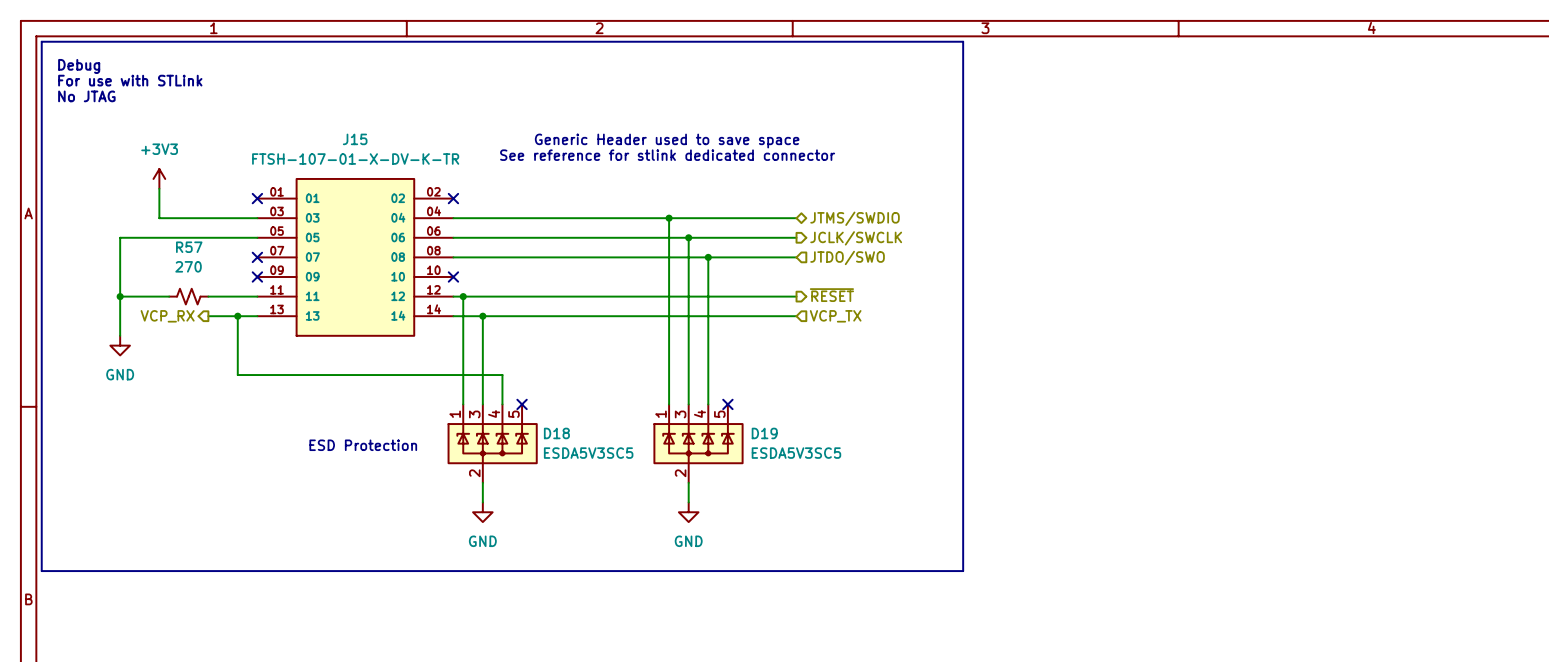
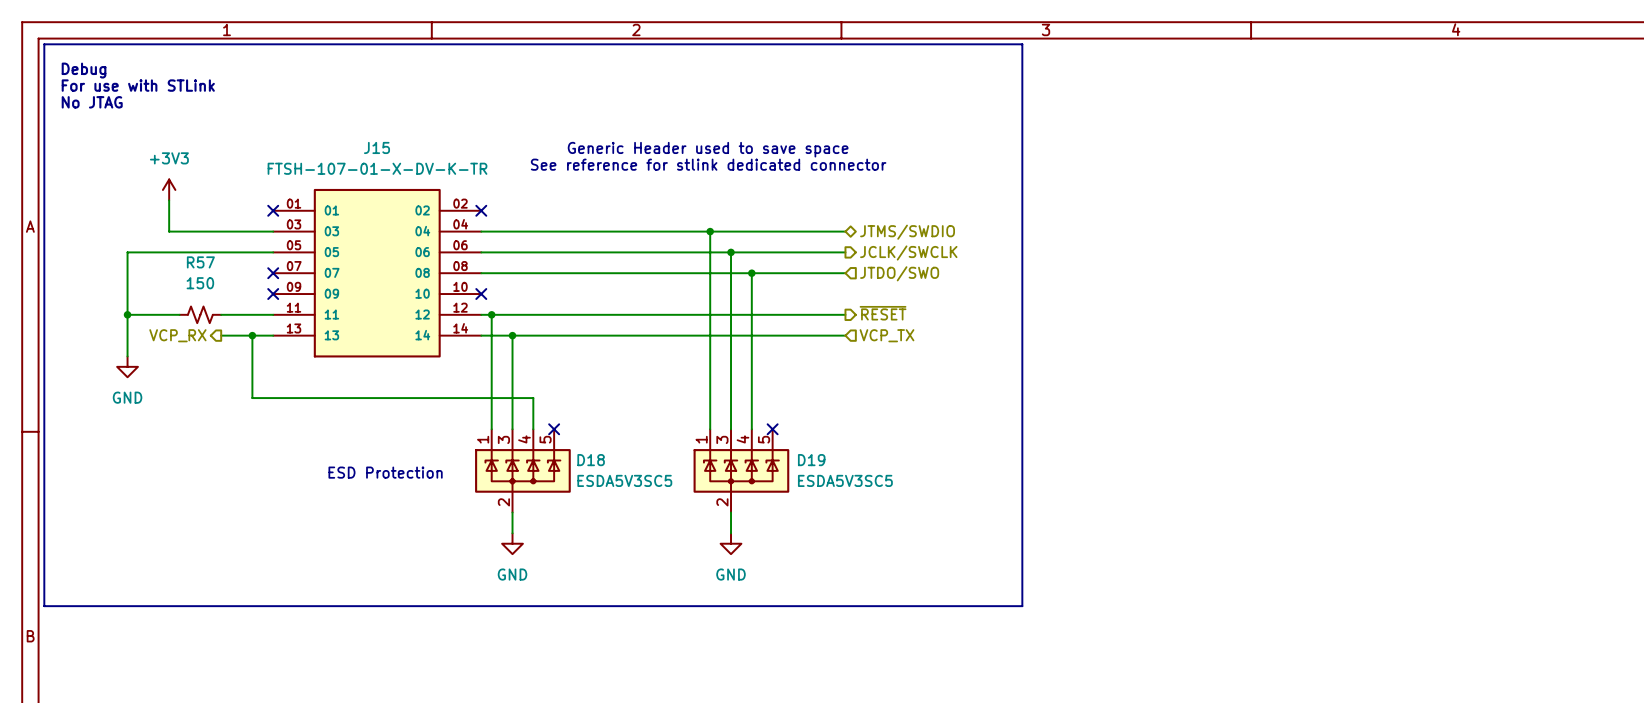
R57 value: 270 (188, 266) -> 150 (200, 283)

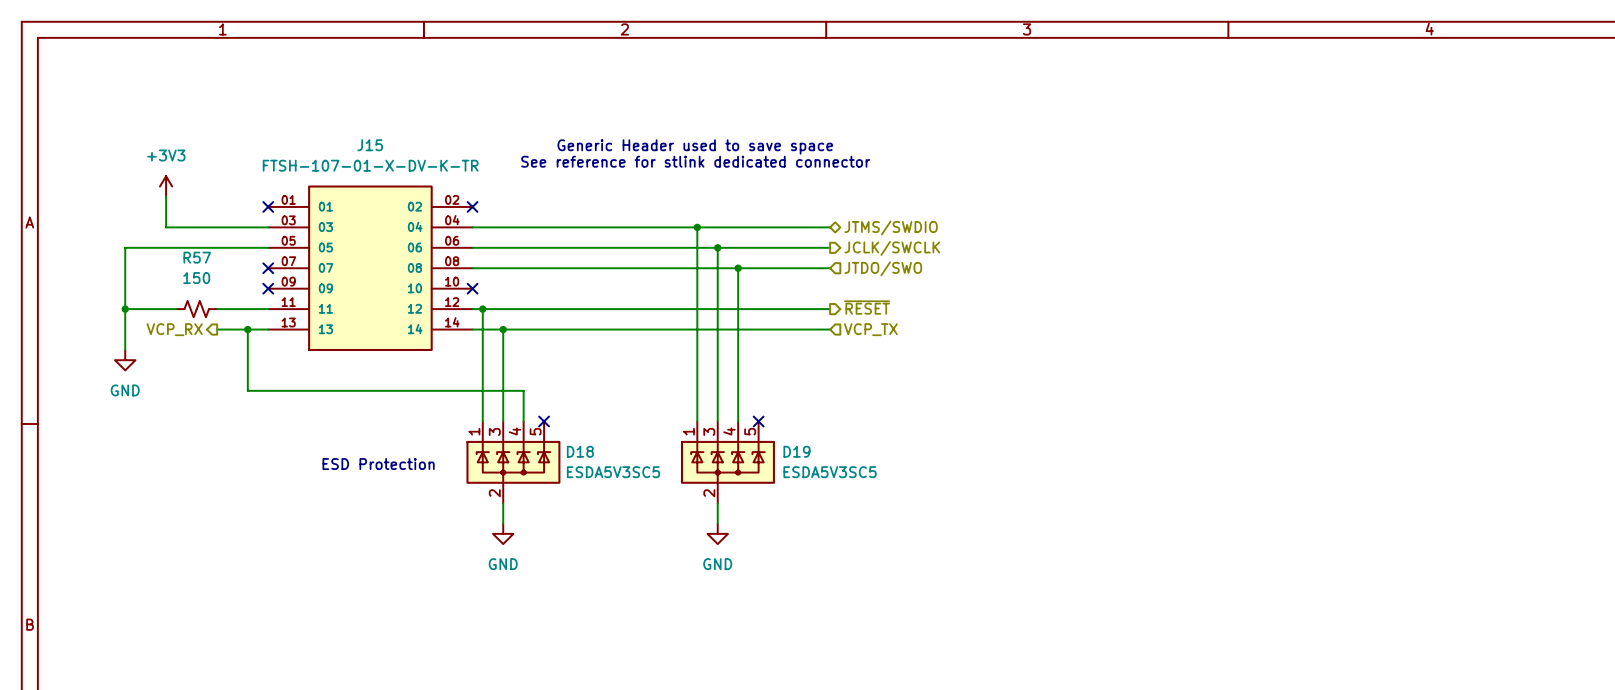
line: (44, 44) (1022, 44) (1022, 606) (44, 606) (44, 44) -> none
text: Debug (84, 70) -> none
text: For use with STLink (138, 85) -> none
text: No JTAG (92, 102) -> none

